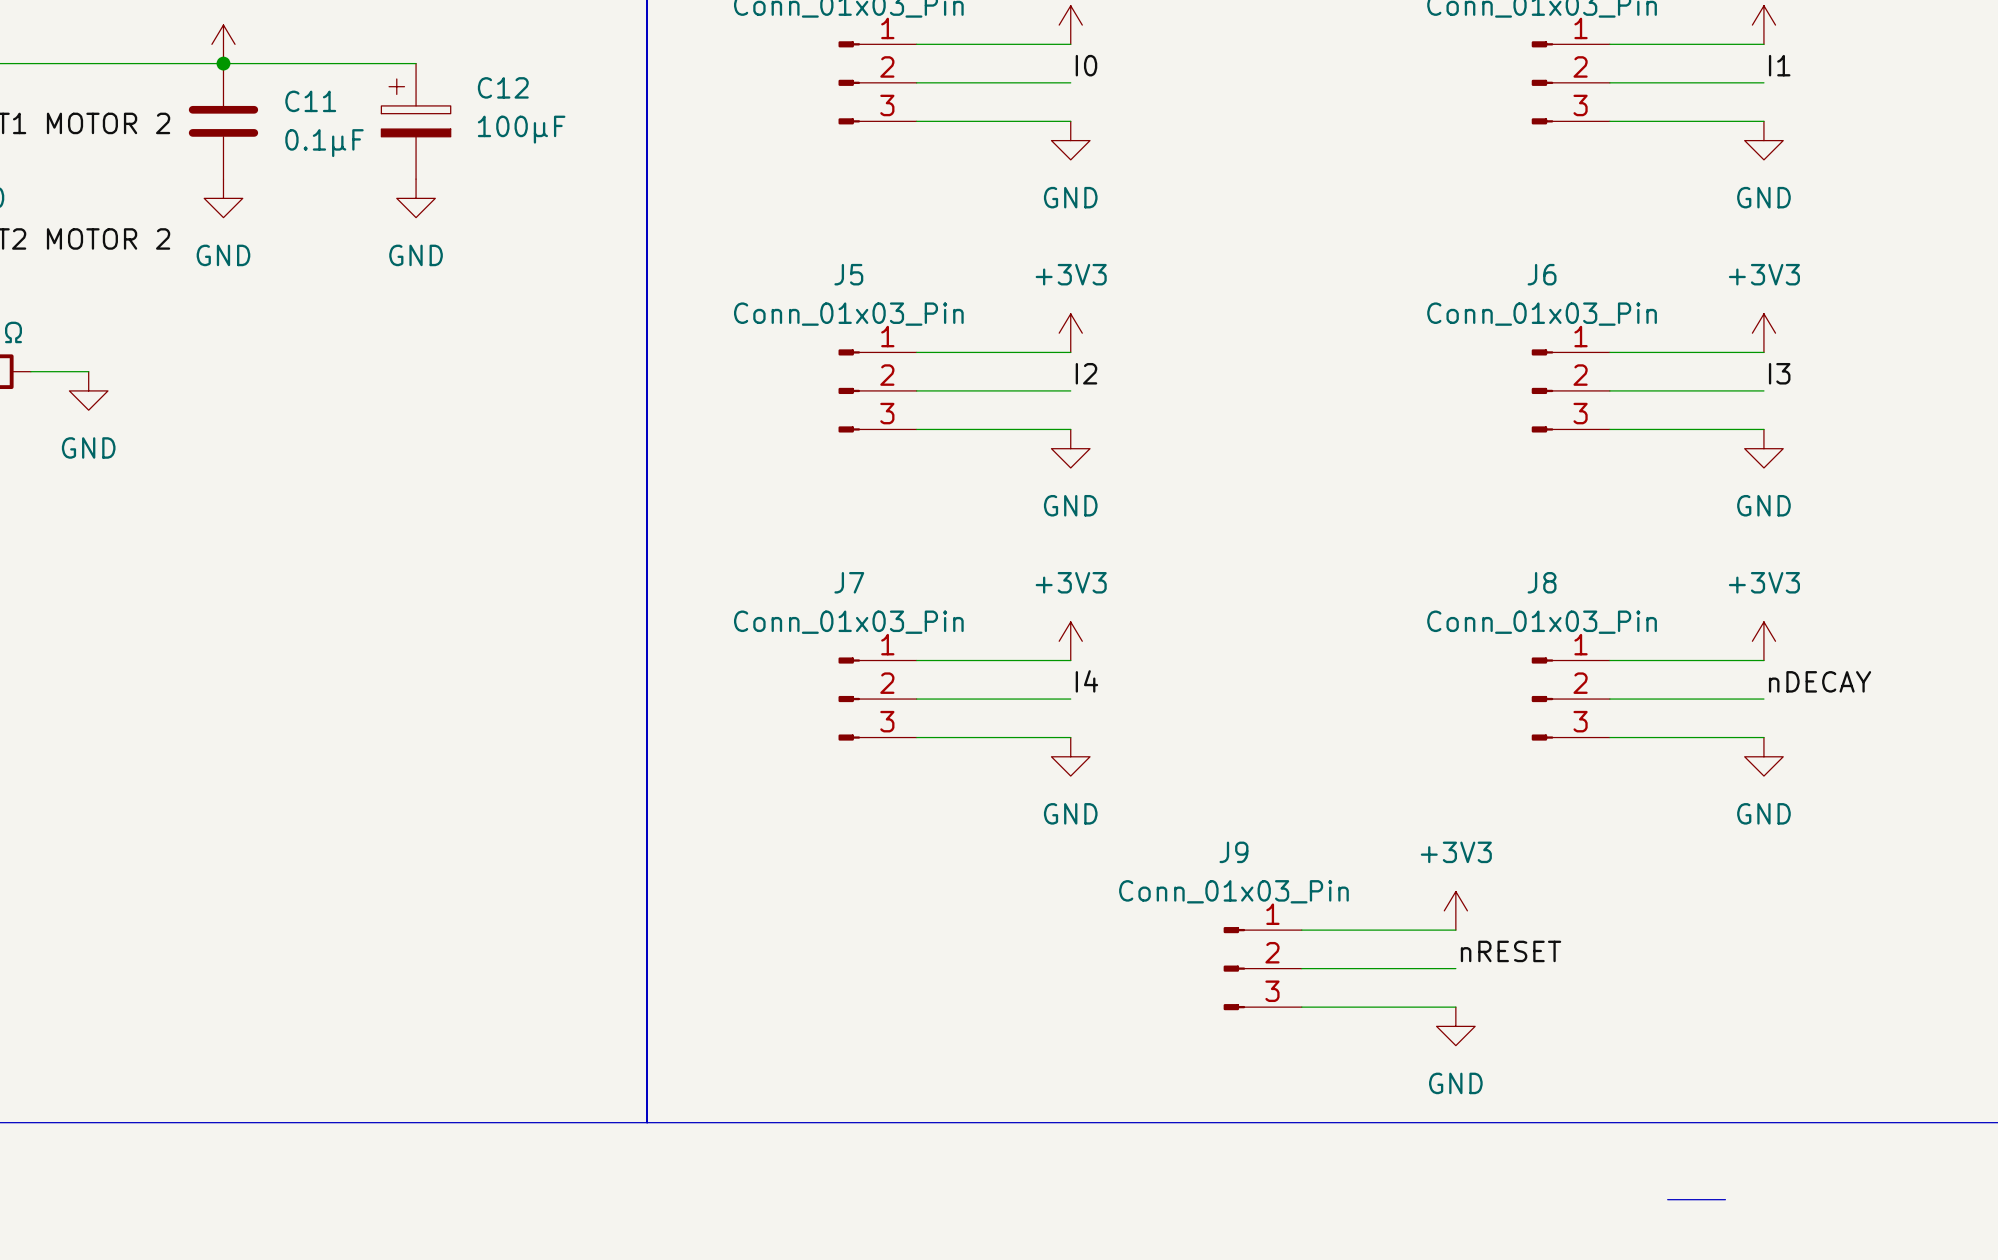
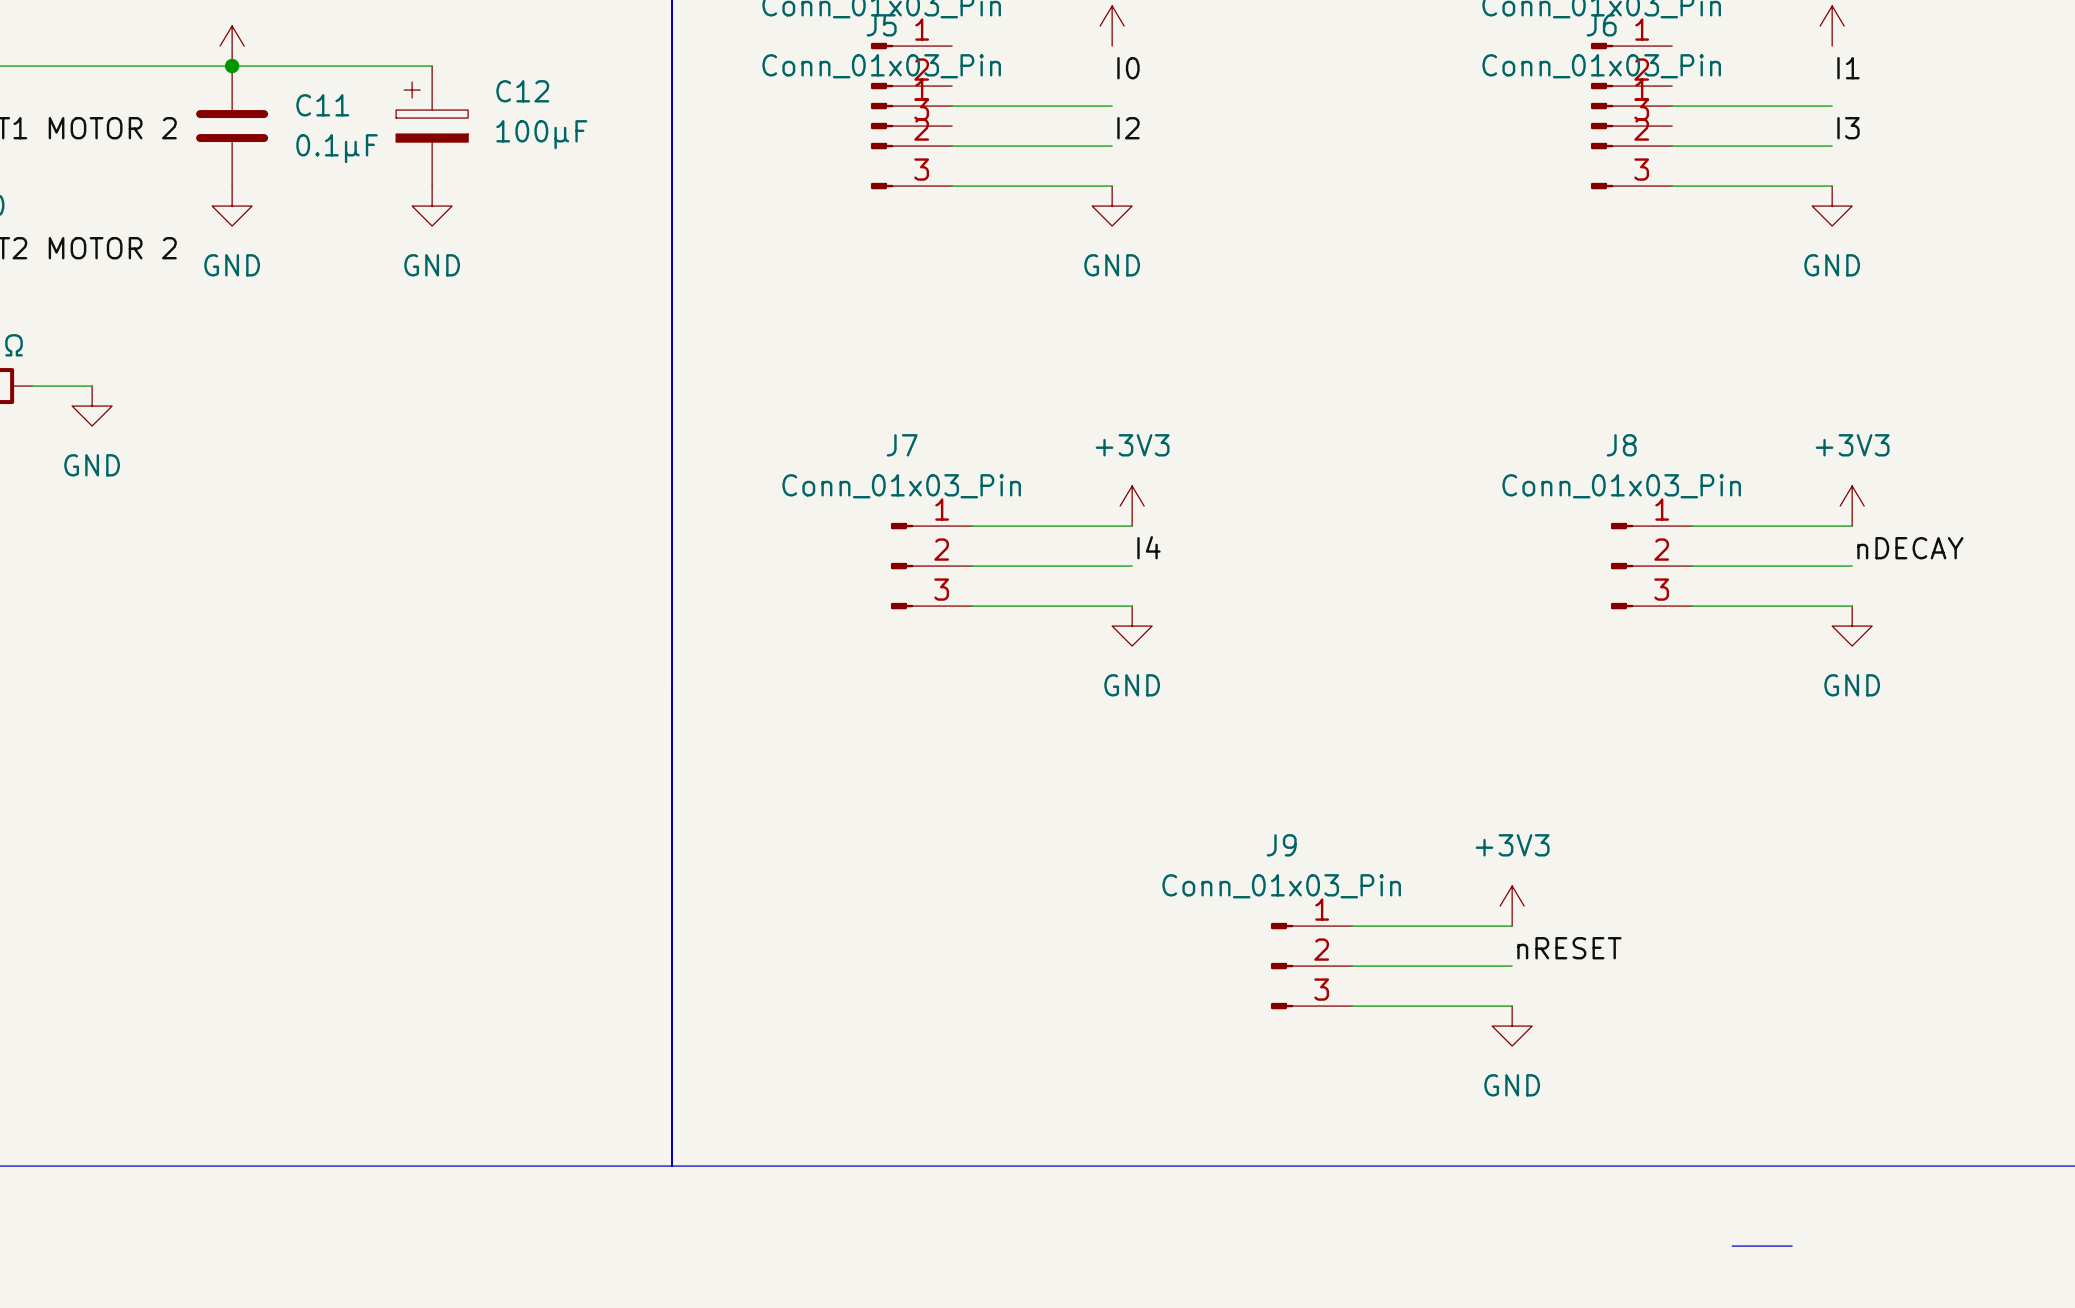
wire: (916, 44) (1070, 44) -> (952, 106) (1112, 106)
wire: (1609, 44) (1763, 44) -> (1672, 106) (1832, 106)
wire: (916, 82) (1070, 82) -> (952, 146) (1112, 146)
wire: (1609, 82) (1763, 82) -> (1672, 146) (1832, 146)
wire: (916, 121) (1070, 121) -> (952, 186) (1112, 186)
wire: (1609, 121) (1763, 121) -> (1672, 186) (1832, 186)
power symbol position: GND (1070, 140) -> GND (1112, 206)
power symbol position: GND (1763, 140) -> GND (1832, 206)
power symbol: +3V3 (1070, 333) -> none
power symbol: +3V3 (1763, 333) -> none
wire: (916, 352) (1070, 352) -> (972, 526) (1132, 526)
wire: (1609, 352) (1763, 352) -> (1692, 526) (1852, 526)
label position: I2 (1086, 373) -> I2 (1128, 128)
label position: I3 (1779, 373) -> I3 (1848, 128)
J5 position: (877, 390) -> (911, 146)
wire: (916, 390) (1070, 390) -> (972, 566) (1132, 566)
J6 position: (1570, 390) -> (1631, 146)
wire: (1609, 390) (1763, 390) -> (1692, 566) (1852, 566)
wire: (916, 429) (1070, 429) -> (972, 606) (1132, 606)
wire: (1609, 429) (1763, 429) -> (1692, 606) (1852, 606)
power symbol: GND (1070, 448) -> none
power symbol: GND (1763, 448) -> none
power symbol: none -> +3V3 (1132, 506)
power symbol: none -> +3V3 (1852, 506)
power symbol: none -> GND (1132, 626)
power symbol: none -> GND (1852, 626)
power symbol: +3V3 (1070, 641) -> none
power symbol: +3V3 (1763, 641) -> none
wire: (916, 660) (1070, 660) -> none
wire: (1609, 660) (1763, 660) -> none
label position: I4 (1086, 681) -> I4 (1148, 547)
label position: nDECAY (1820, 681) -> nDECAY (1910, 548)
J7 position: (877, 699) -> (931, 566)
wire: (916, 699) (1070, 699) -> none
J8 position: (1570, 699) -> (1651, 566)
wire: (1609, 699) (1763, 699) -> none
wire: (916, 737) (1070, 737) -> none
wire: (1609, 737) (1763, 737) -> none
power symbol: GND (1070, 756) -> none
power symbol: GND (1763, 756) -> none
power symbol position: +3V3 (1455, 910) -> +3V3 (1512, 906)
label position: nRESET (1511, 951) -> nRESET (1569, 948)
J9 position: (1262, 968) -> (1311, 966)
wire: (1301, 1007) (1455, 1007) -> (1352, 926) (1512, 926)
power symbol position: GND (1455, 1026) -> GND (1512, 1026)

